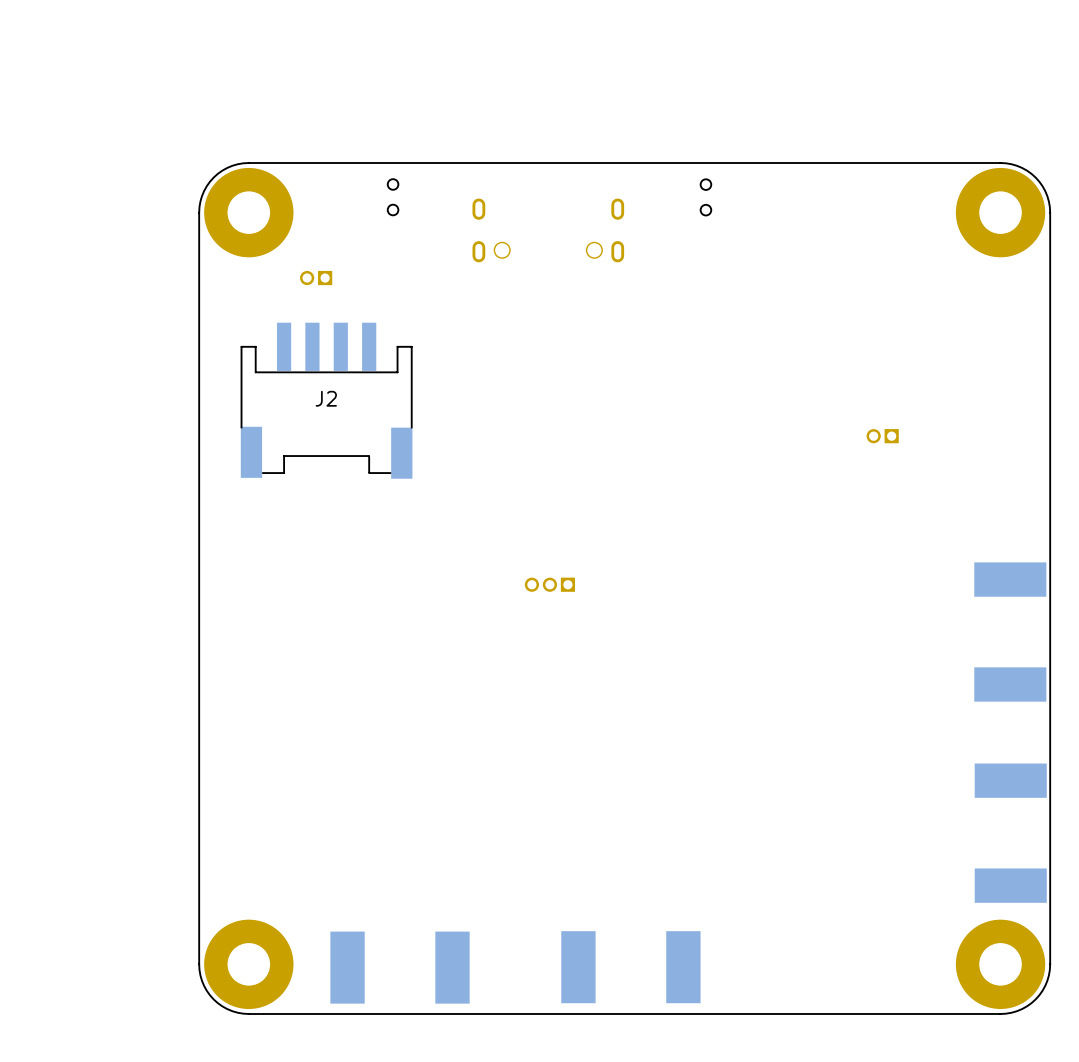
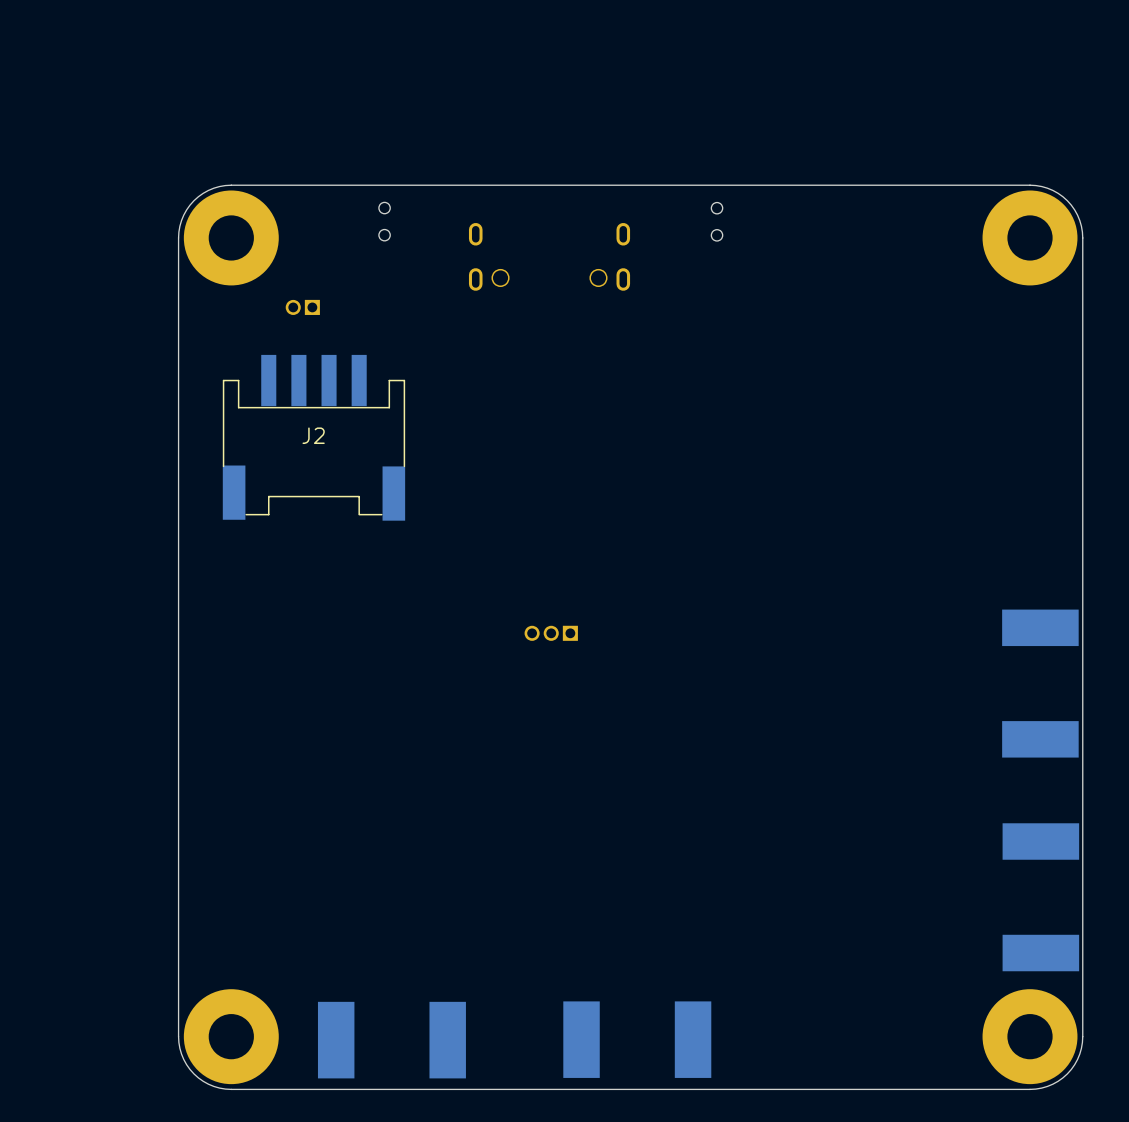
part: (882, 436) -> none

